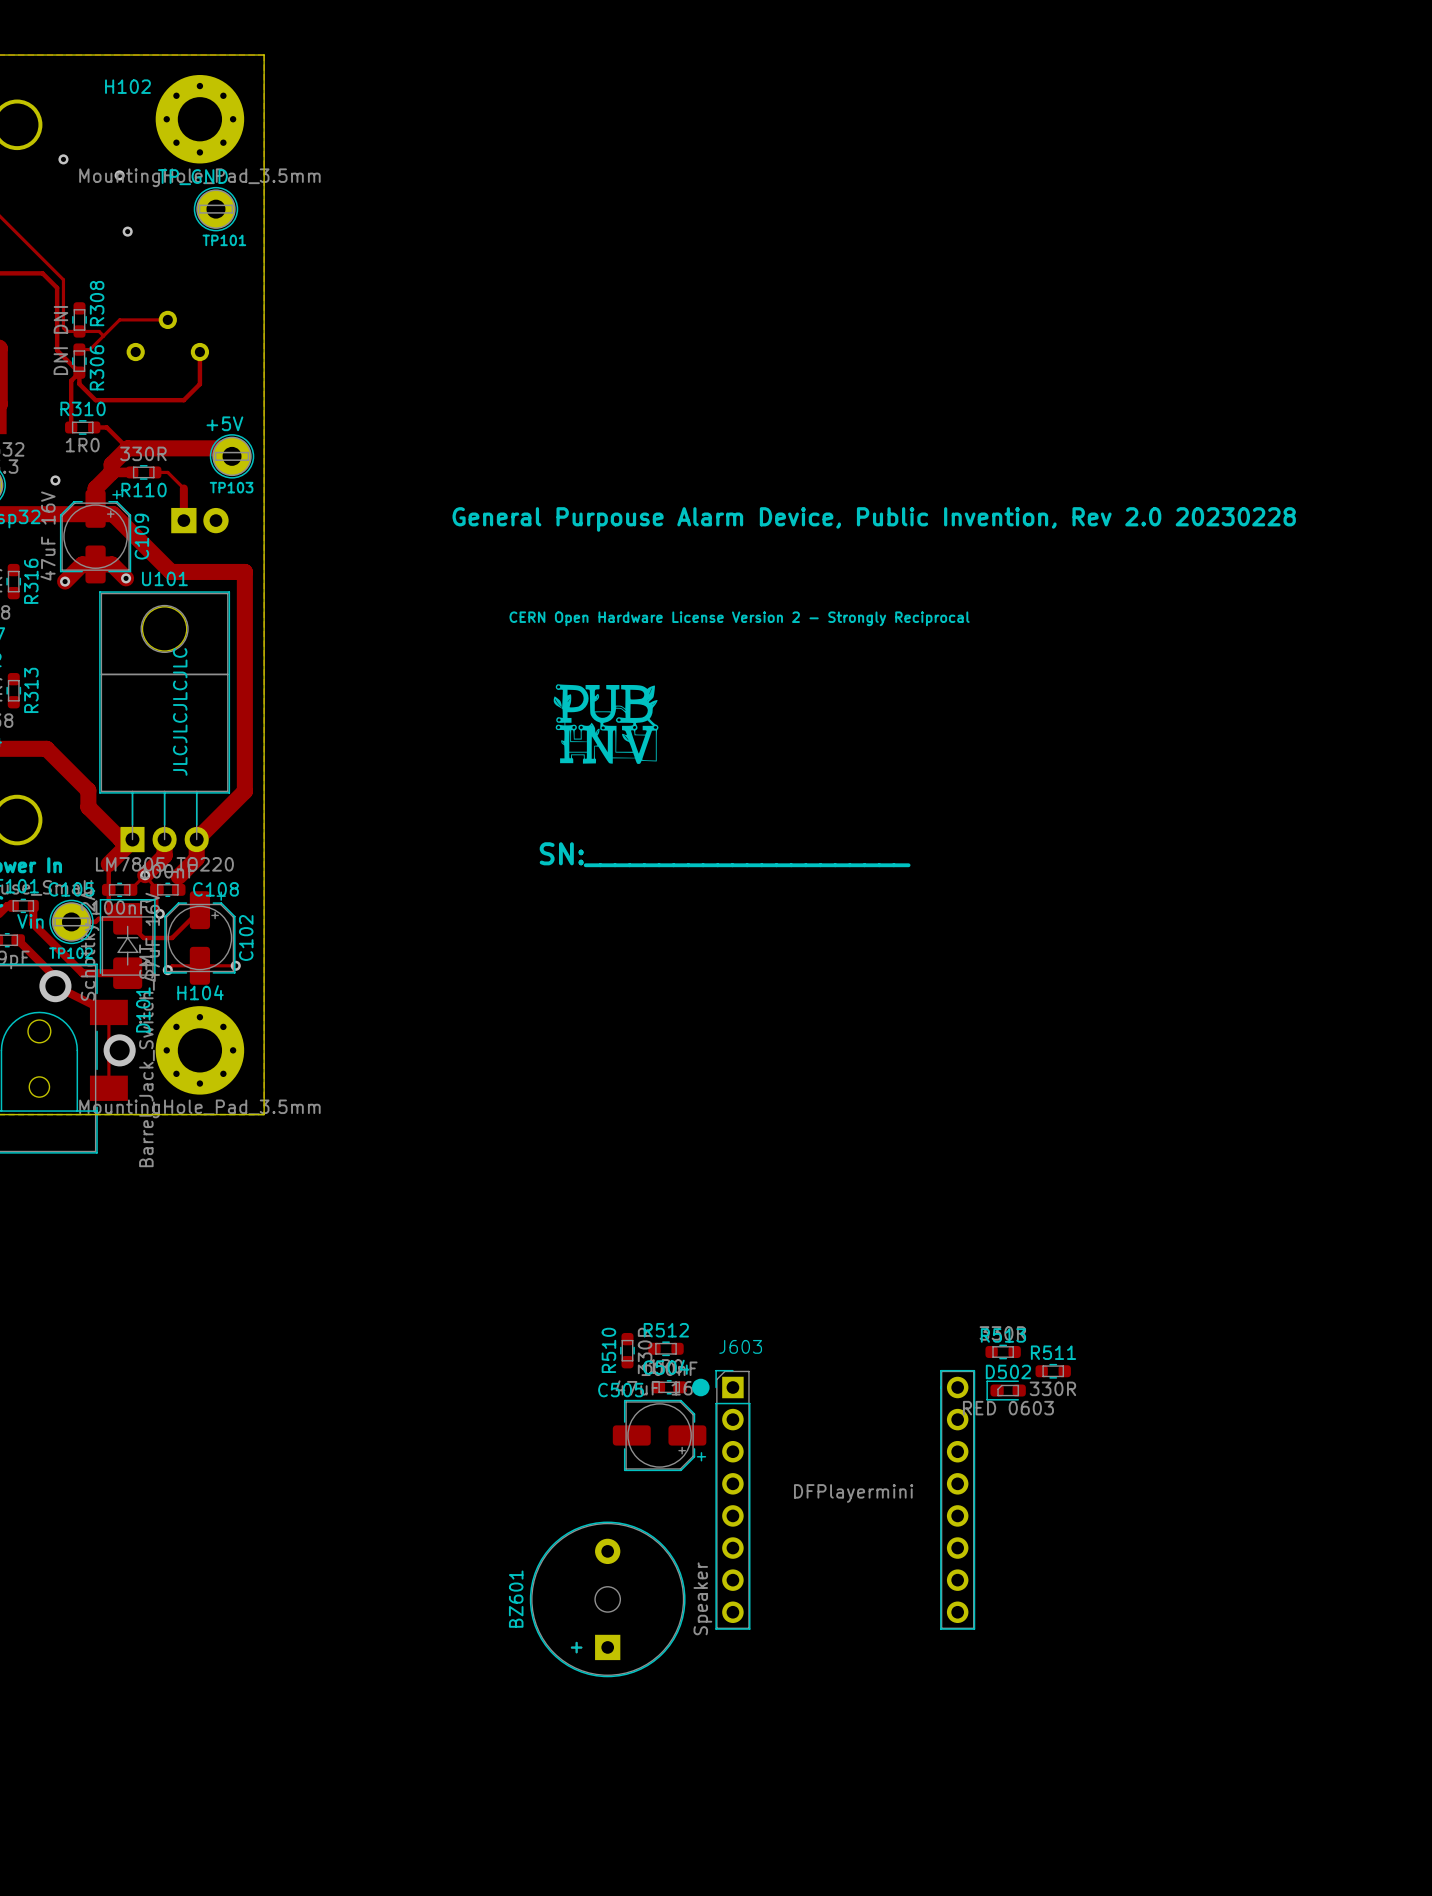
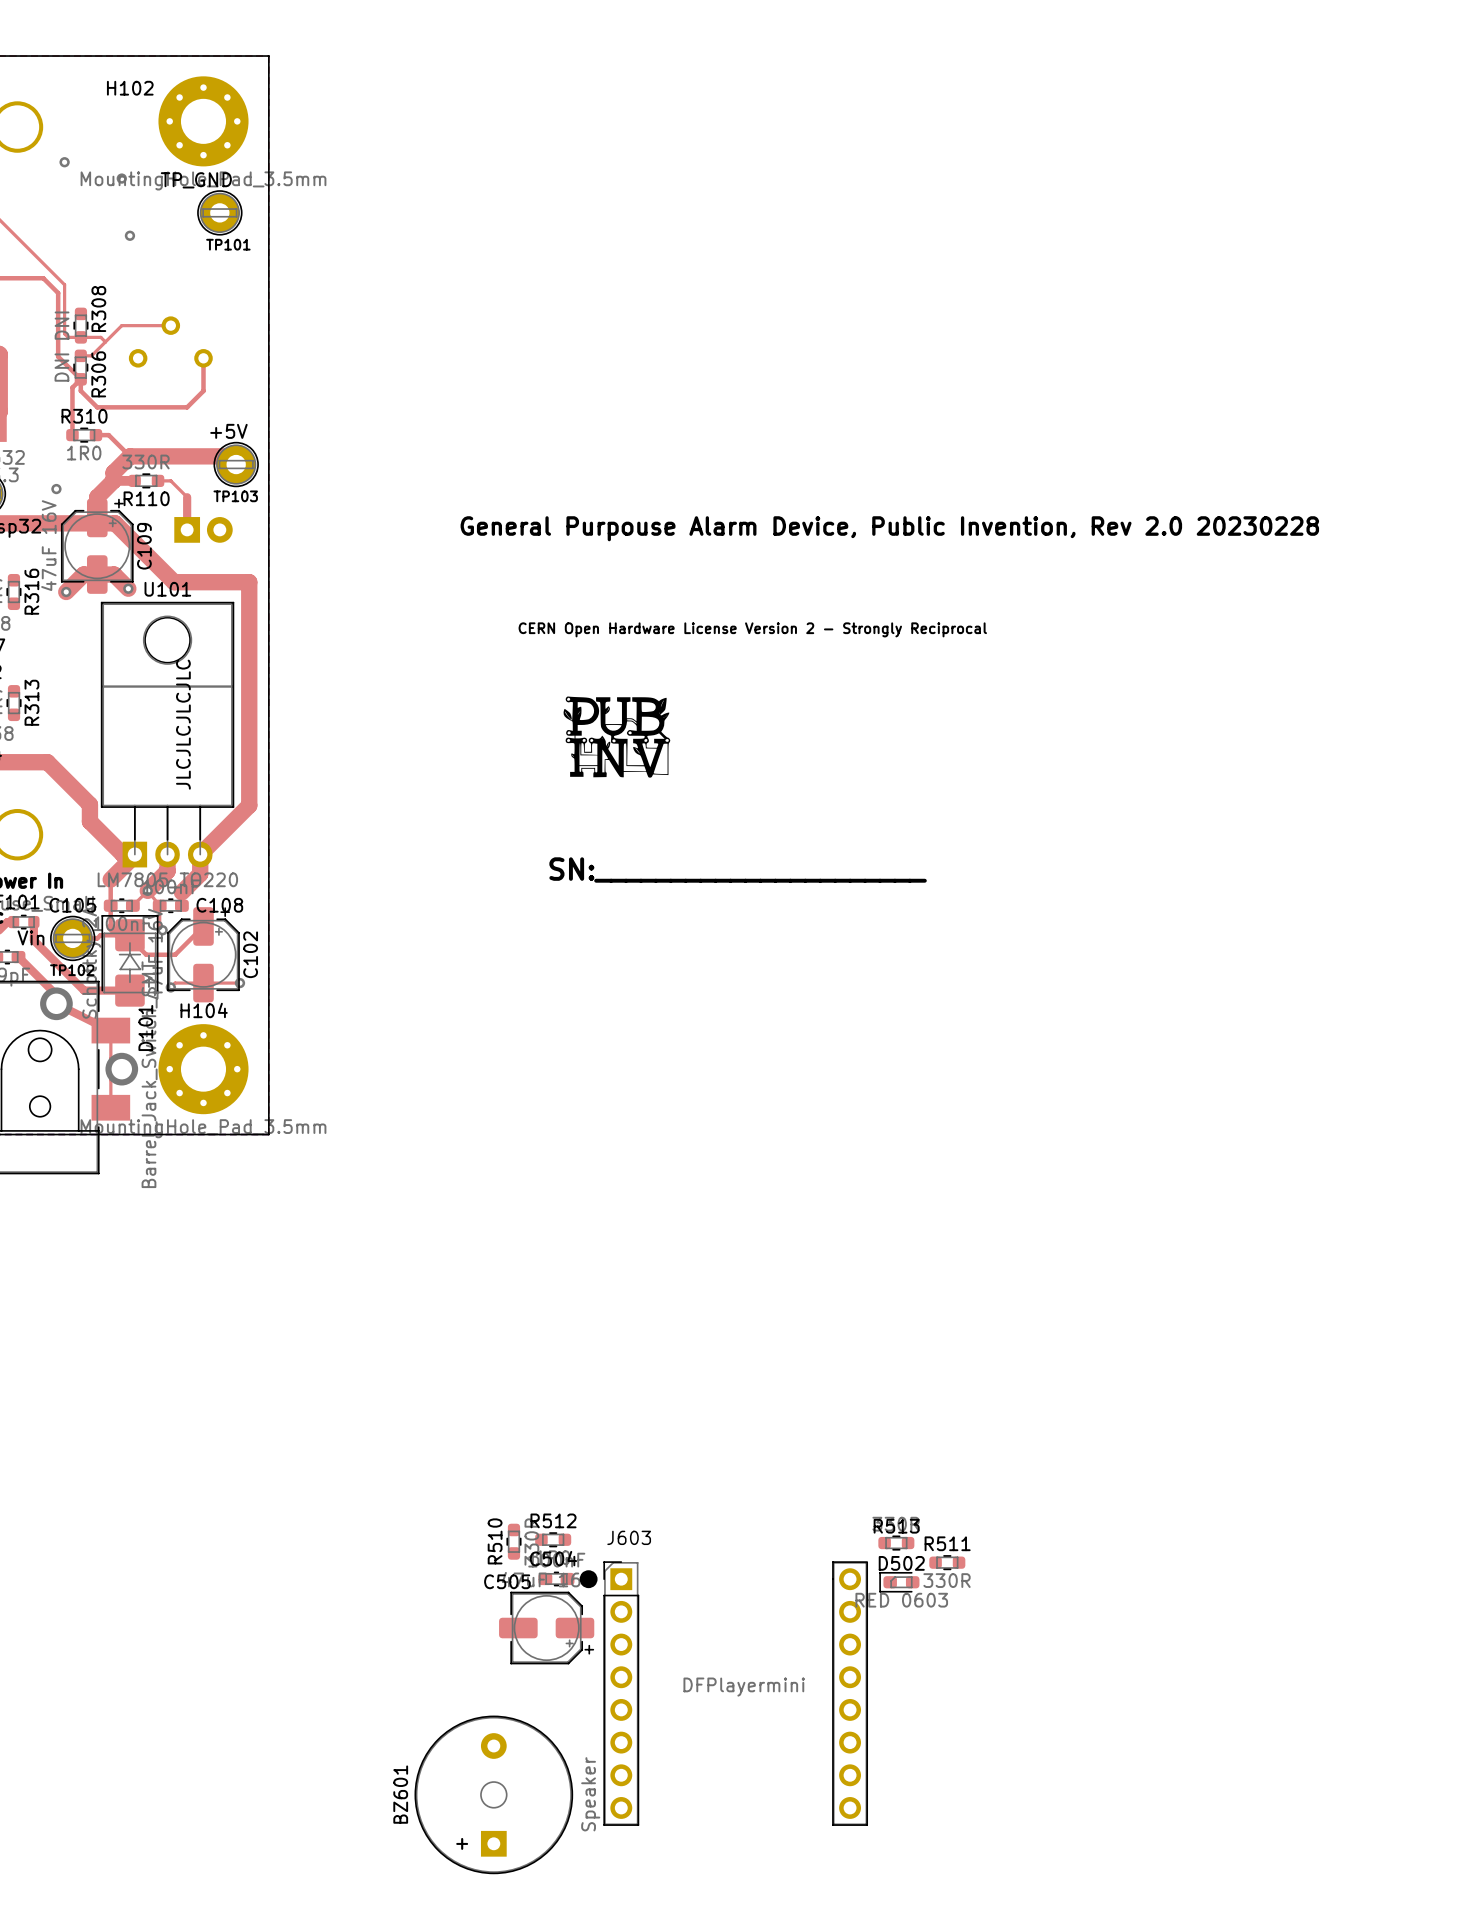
R512 position: (666, 1348) -> (553, 1539)
R510 position: (627, 1350) -> (513, 1541)
R513 position: (1003, 1351) -> (896, 1543)
R511 position: (1053, 1371) -> (947, 1562)
C504 position: (669, 1387) -> (556, 1579)
D502 position: (1006, 1390) -> (899, 1582)
C505 position: (659, 1435) -> (546, 1628)
J603 position: (833, 1499) -> (723, 1693)
BZ601 position: (607, 1599) -> (493, 1794)

